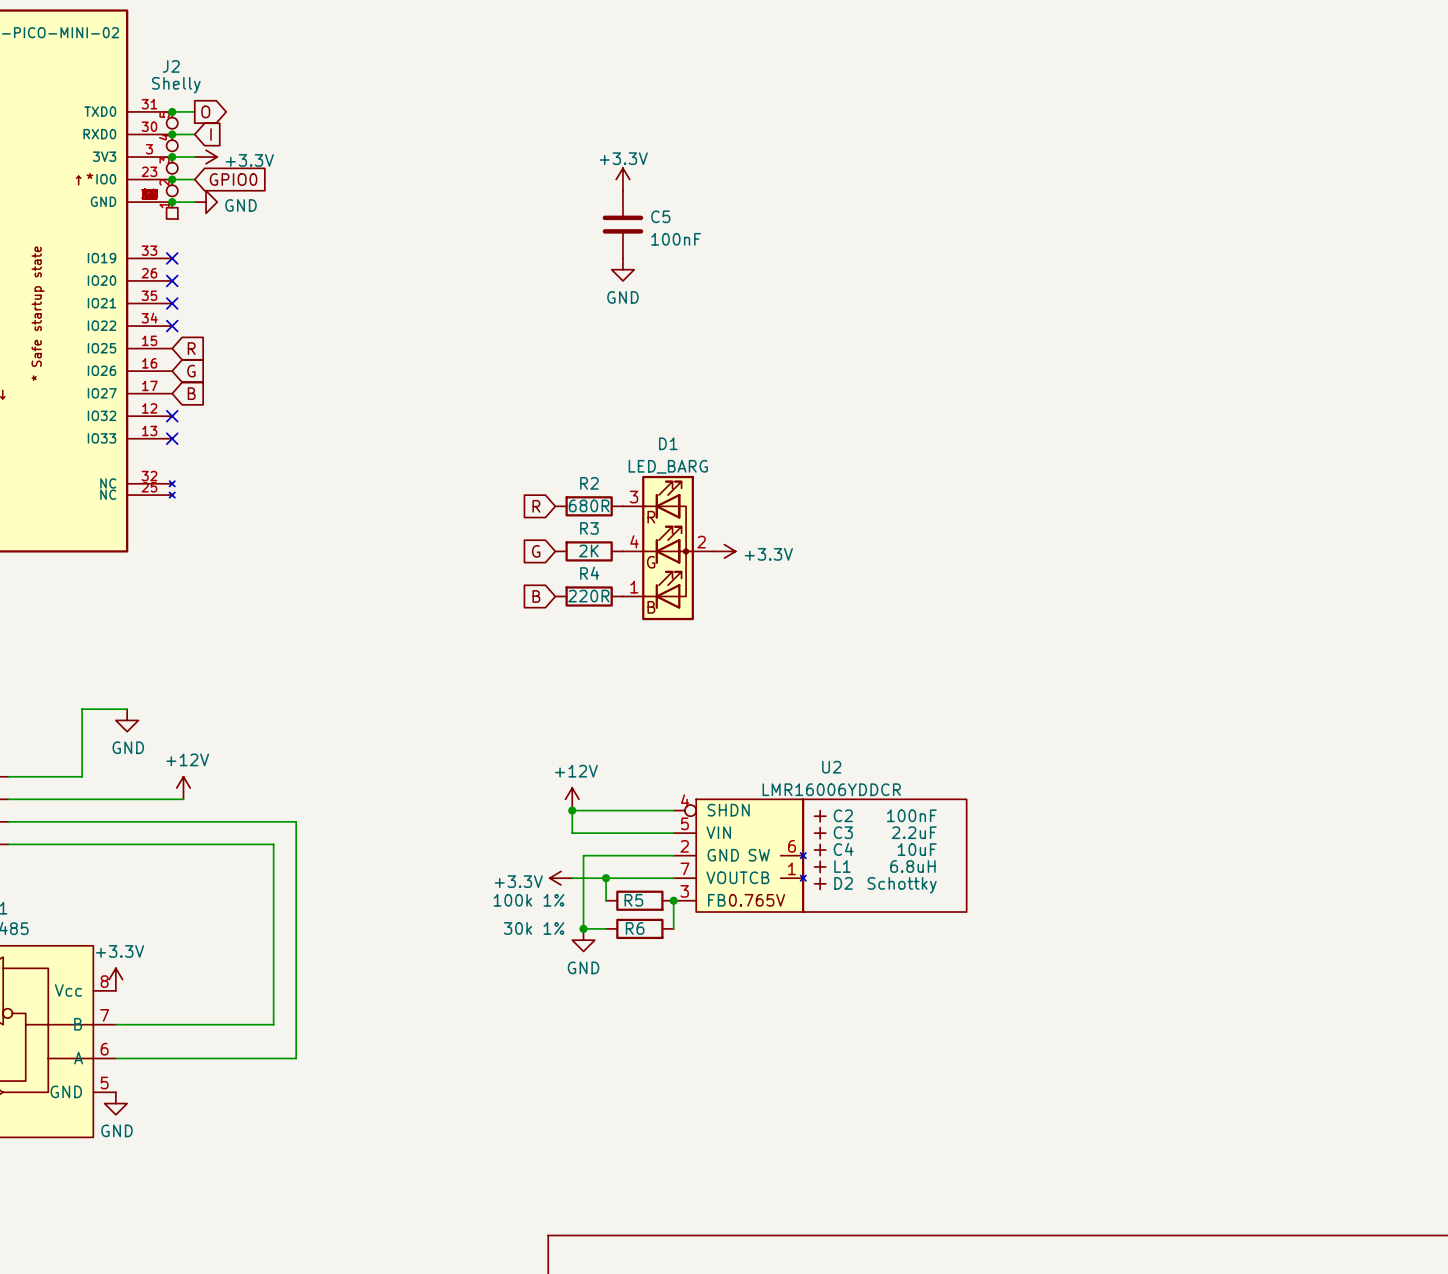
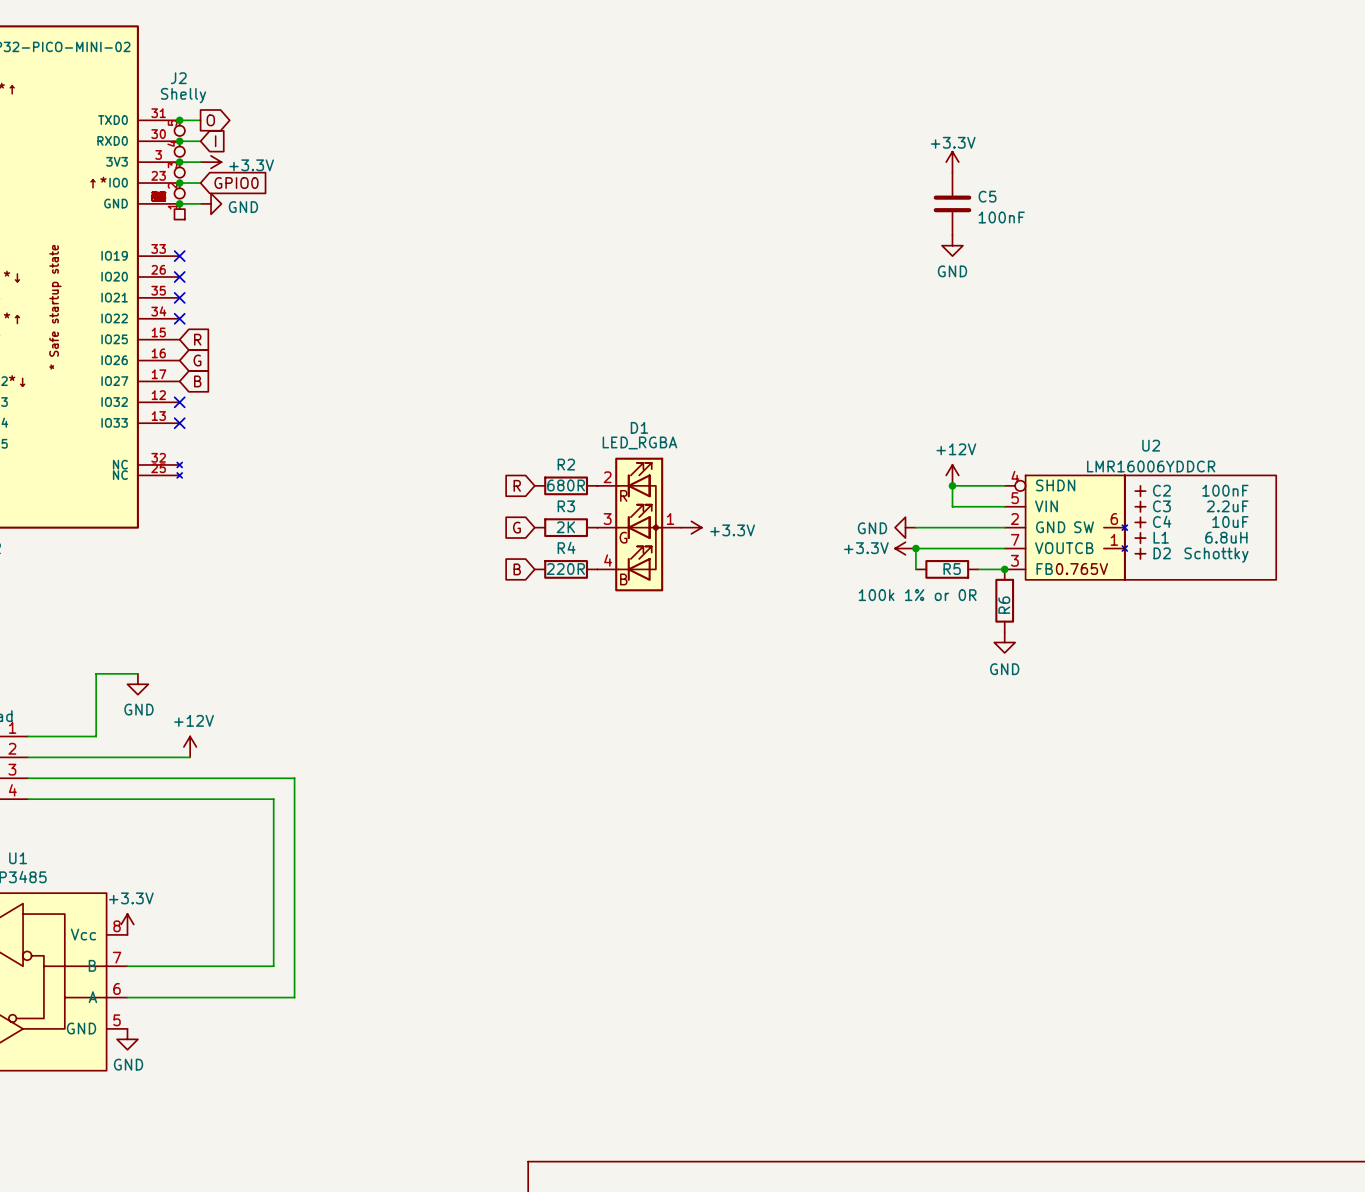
power symbol: none -> +3.3V (952, 162)
power symbol: +3.3V (622, 179) -> none
C5 position: (622, 224) -> (952, 203)
power symbol: none -> GND (952, 245)
power symbol: GND (622, 269) -> none
D1 value: LED_BARG (668, 466) -> LED_RGBA (639, 442)
power symbol: none -> +12V (952, 475)
D1 pin number: 3 (633, 497) -> 2 (607, 477)
junction: none -> (952, 485)
wire: none -> (1004, 485) (952, 485) (952, 506) (1004, 506)
D1 pin number: 4 (634, 541) -> 3 (607, 519)
D1 pin number: 2 (701, 542) -> 1 (670, 519)
power symbol: none -> GND (905, 527)
wire: none -> (915, 527) (1004, 527)
U2: none -> LMR16006YDDCR (1140, 527)
power symbol: none -> +3.3V (905, 548)
junction: none -> (915, 548)
wire: none -> (1004, 548) (915, 548) (915, 569)
D1 pin number: 1 (634, 587) -> 4 (608, 560)
wire: none -> (978, 569) (1004, 569)
junction: none -> (1004, 569)
power symbol: none -> GND (1004, 642)
power symbol: +12V (572, 799) -> none
junction: (572, 810) -> none
wire: (673, 810) (572, 810) (572, 833) (673, 833) -> none
C2 position: (820, 816) -> (1140, 491)
C3 position: (820, 833) -> (1140, 506)
C4 position: (820, 850) -> (1140, 522)
wire: (673, 855) (583, 855) (583, 928) (606, 928) -> none
U2: LMR16006YDDCR (820, 855) -> none
L1 position: (820, 866) -> (1140, 538)
power symbol: +3.3V (560, 878) -> none
wire: (572, 878) (673, 878) -> none
wire: (606, 878) (606, 900) -> none
junction: (606, 878) -> none
D2 position: (820, 883) -> (1140, 553)
R5 value: 100k 1% (528, 900) -> 100k 1% or 0R (917, 595)
R5 name position: R5 (633, 900) -> R5 (952, 569)
R5 position: (639, 900) -> (947, 569)
wire: (673, 900) (673, 928) -> none
junction: (673, 900) -> none
R6 value: 30k 1% (534, 928) -> none
junction: (583, 928) -> none
R6 rotation: 0° (639, 928) -> 90° clockwise (1004, 600)
R6 position: (639, 928) -> (1004, 600)
power symbol: GND (583, 940) -> none

